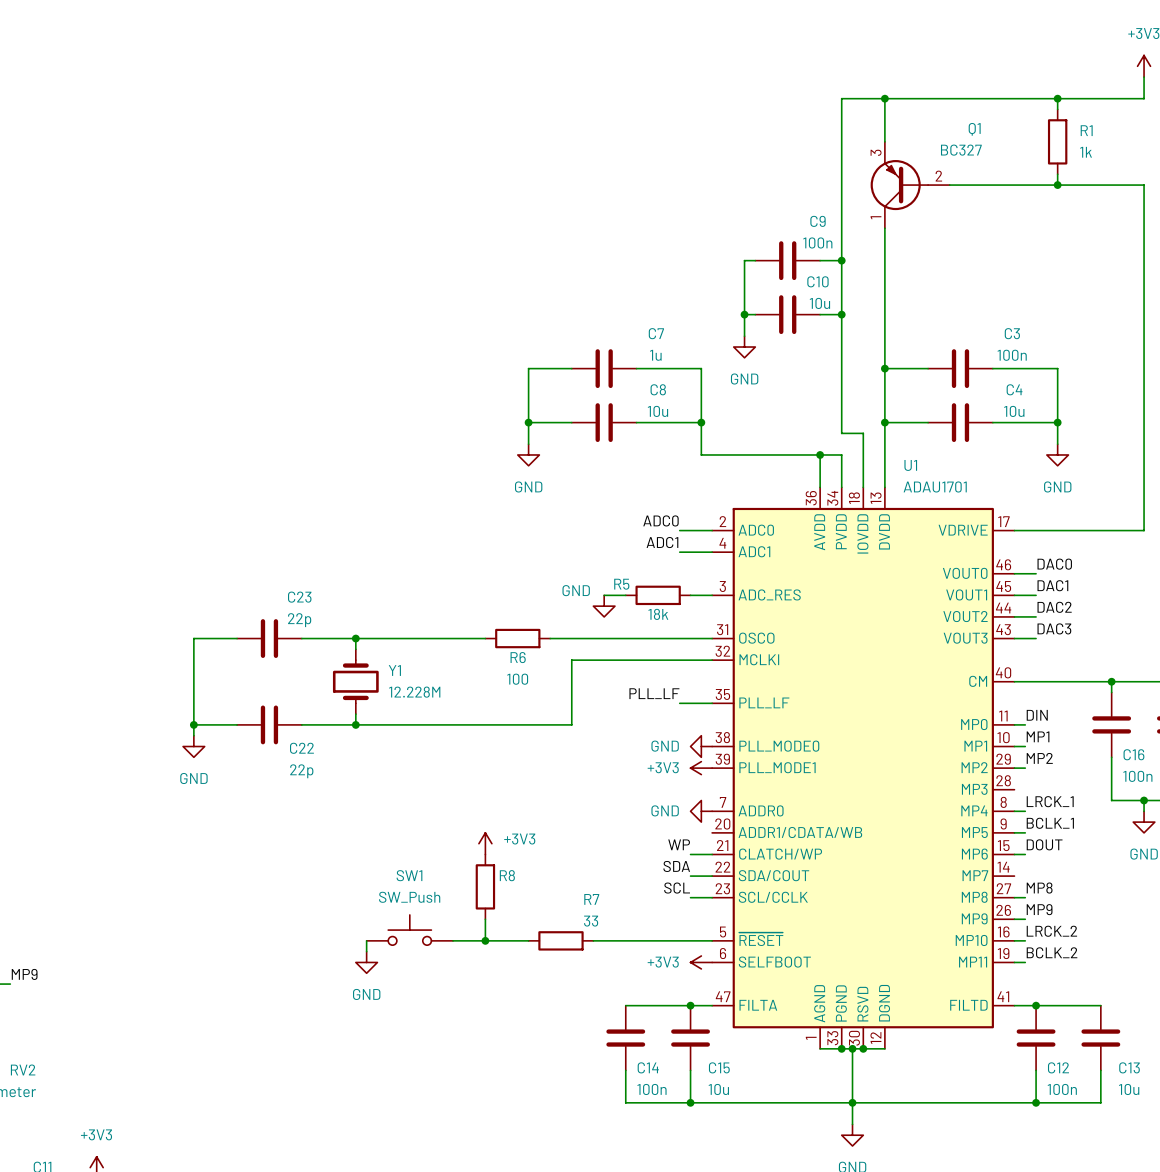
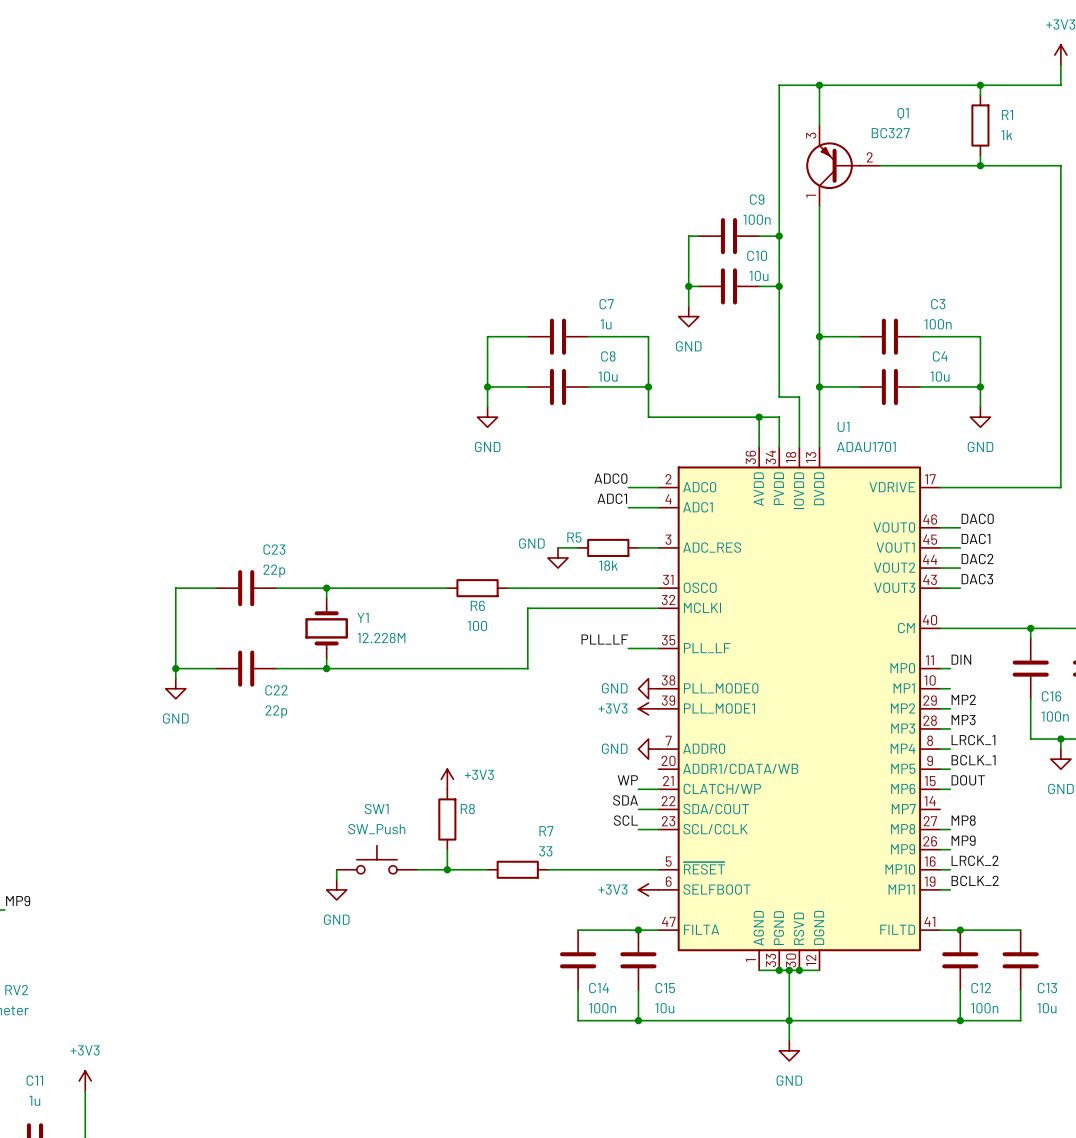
label: MP1 (1038, 736) -> none
label: none -> MP3 (963, 720)
wire: none -> (940, 728) (950, 728)

